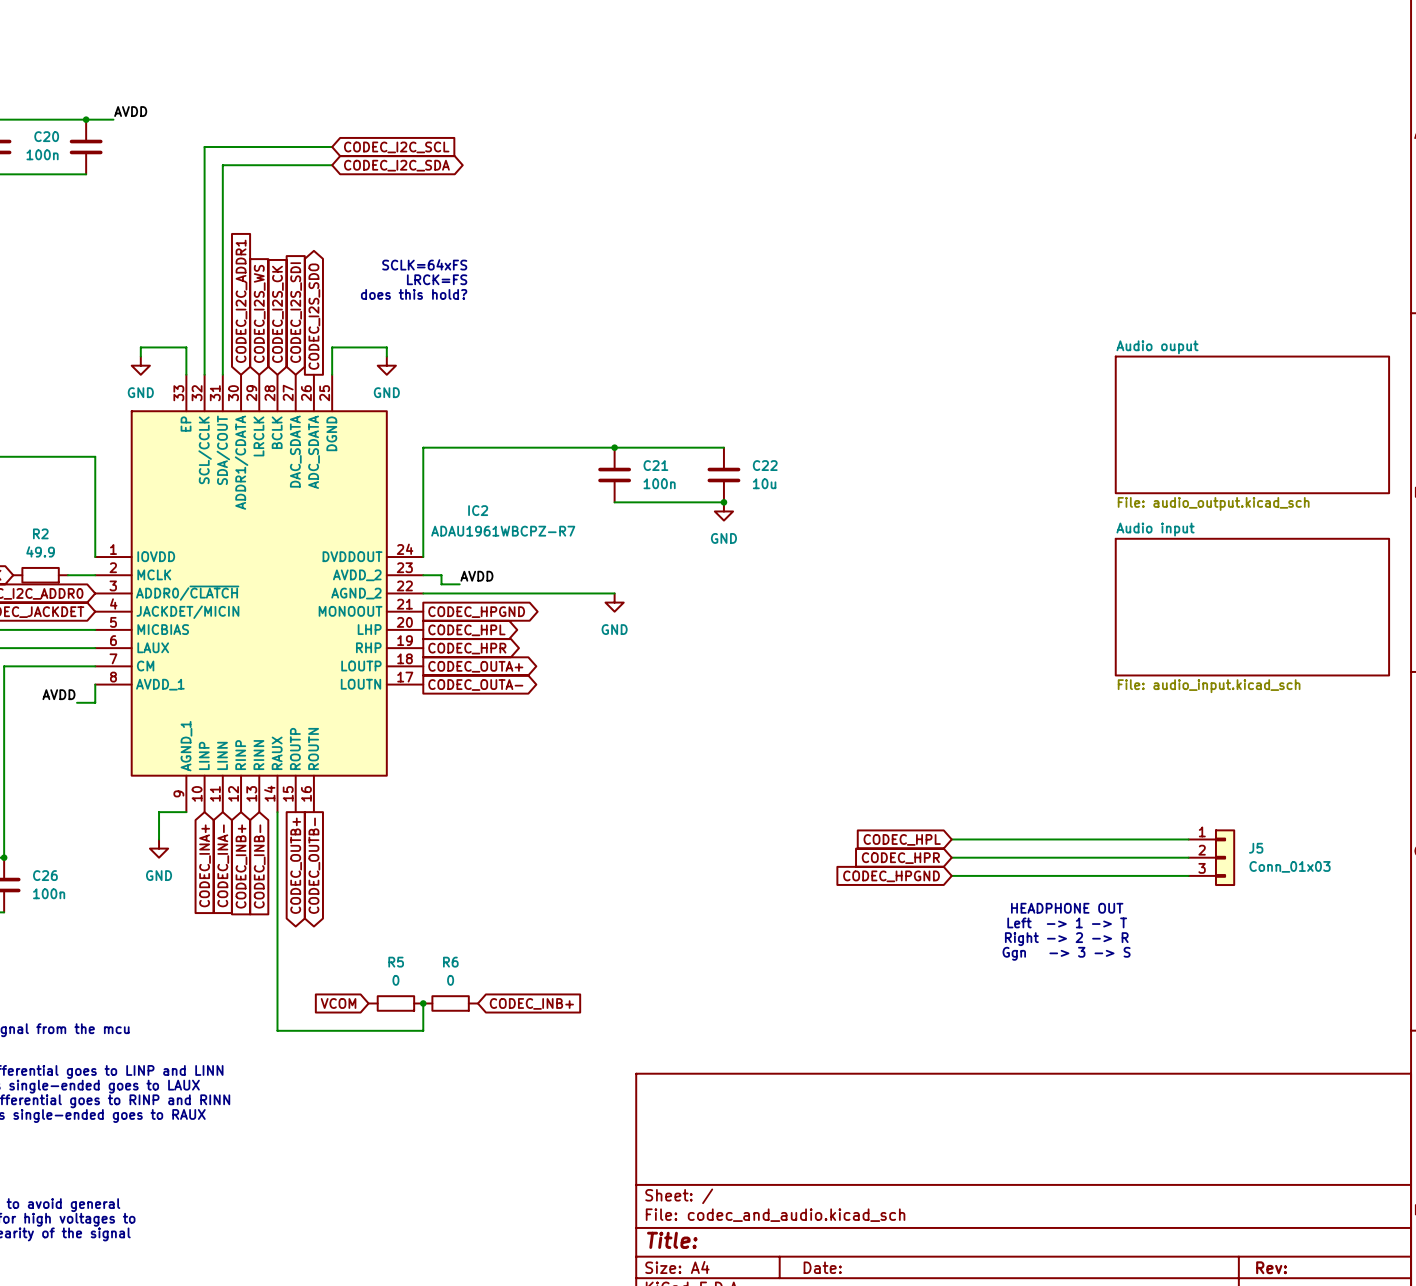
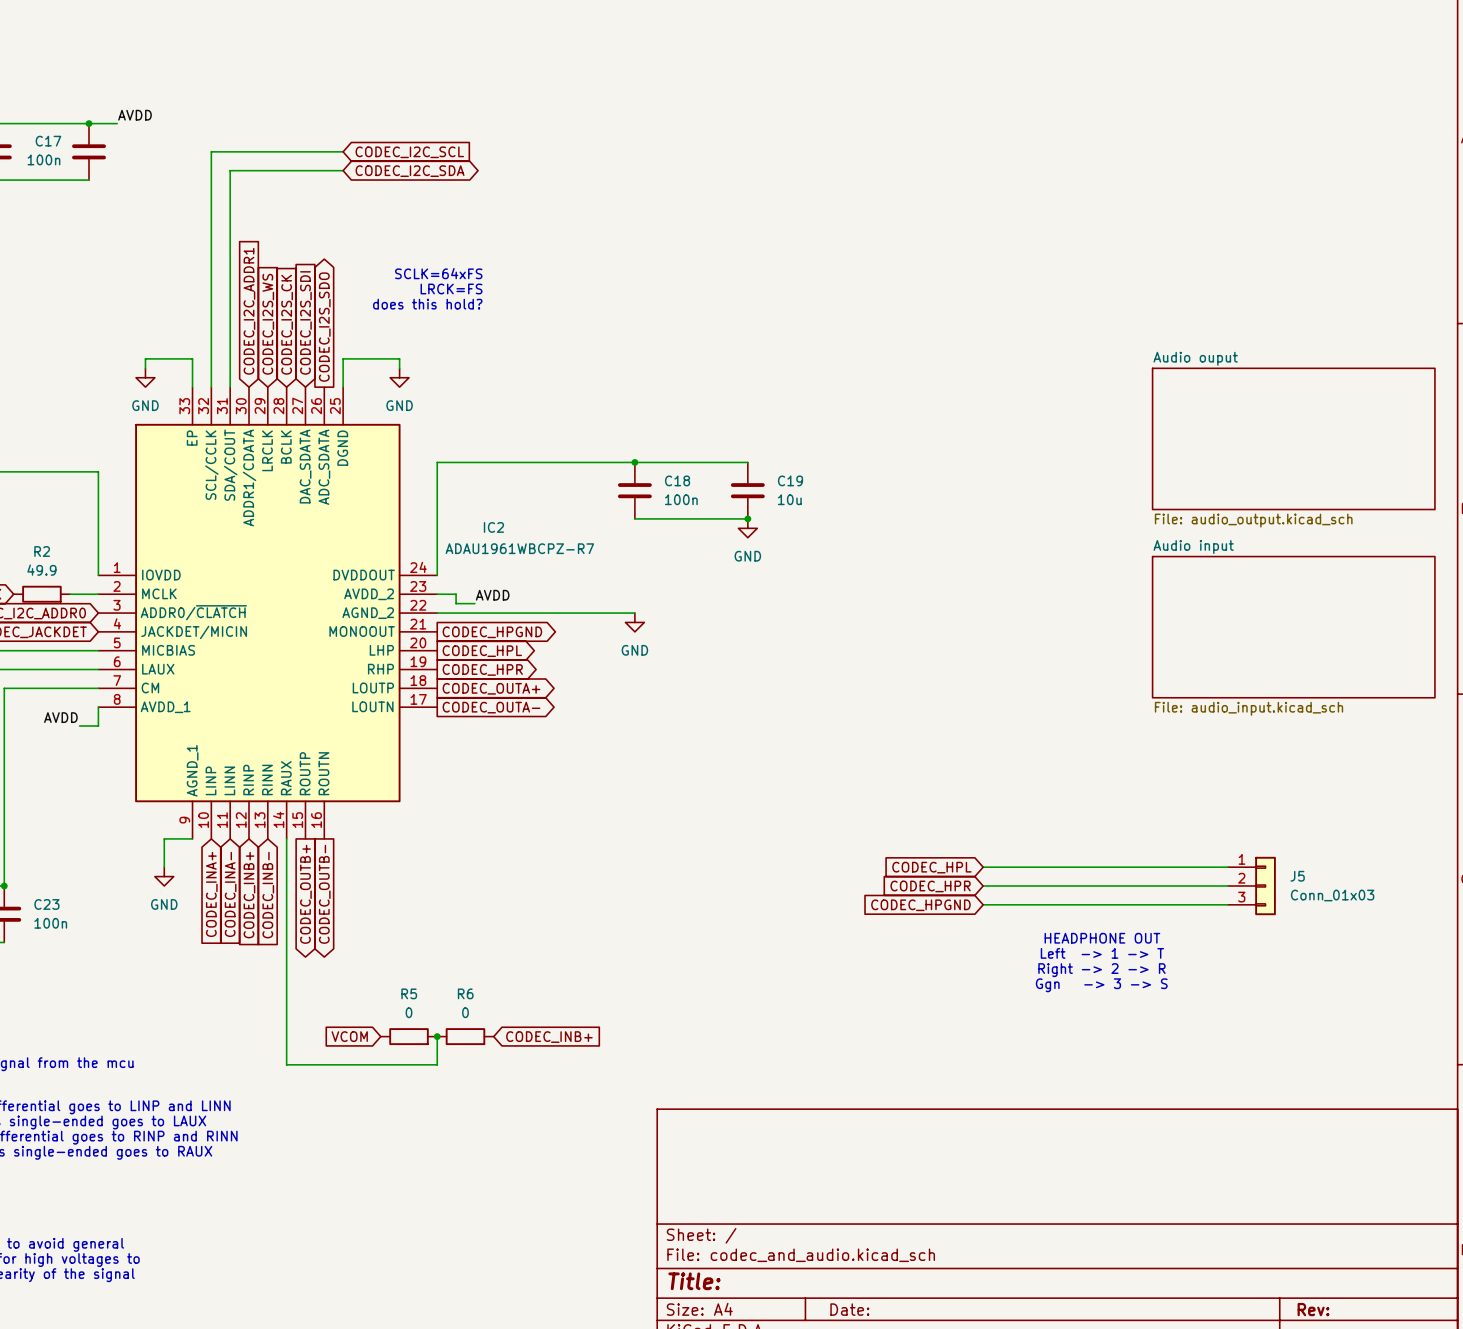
C20 name: C20 (46, 136) -> C17 (48, 141)
C21 name: C21 (655, 465) -> C18 (677, 480)
C22 name: C22 (765, 465) -> C19 (790, 480)
C26 name: C26 (45, 875) -> C23 (46, 904)

